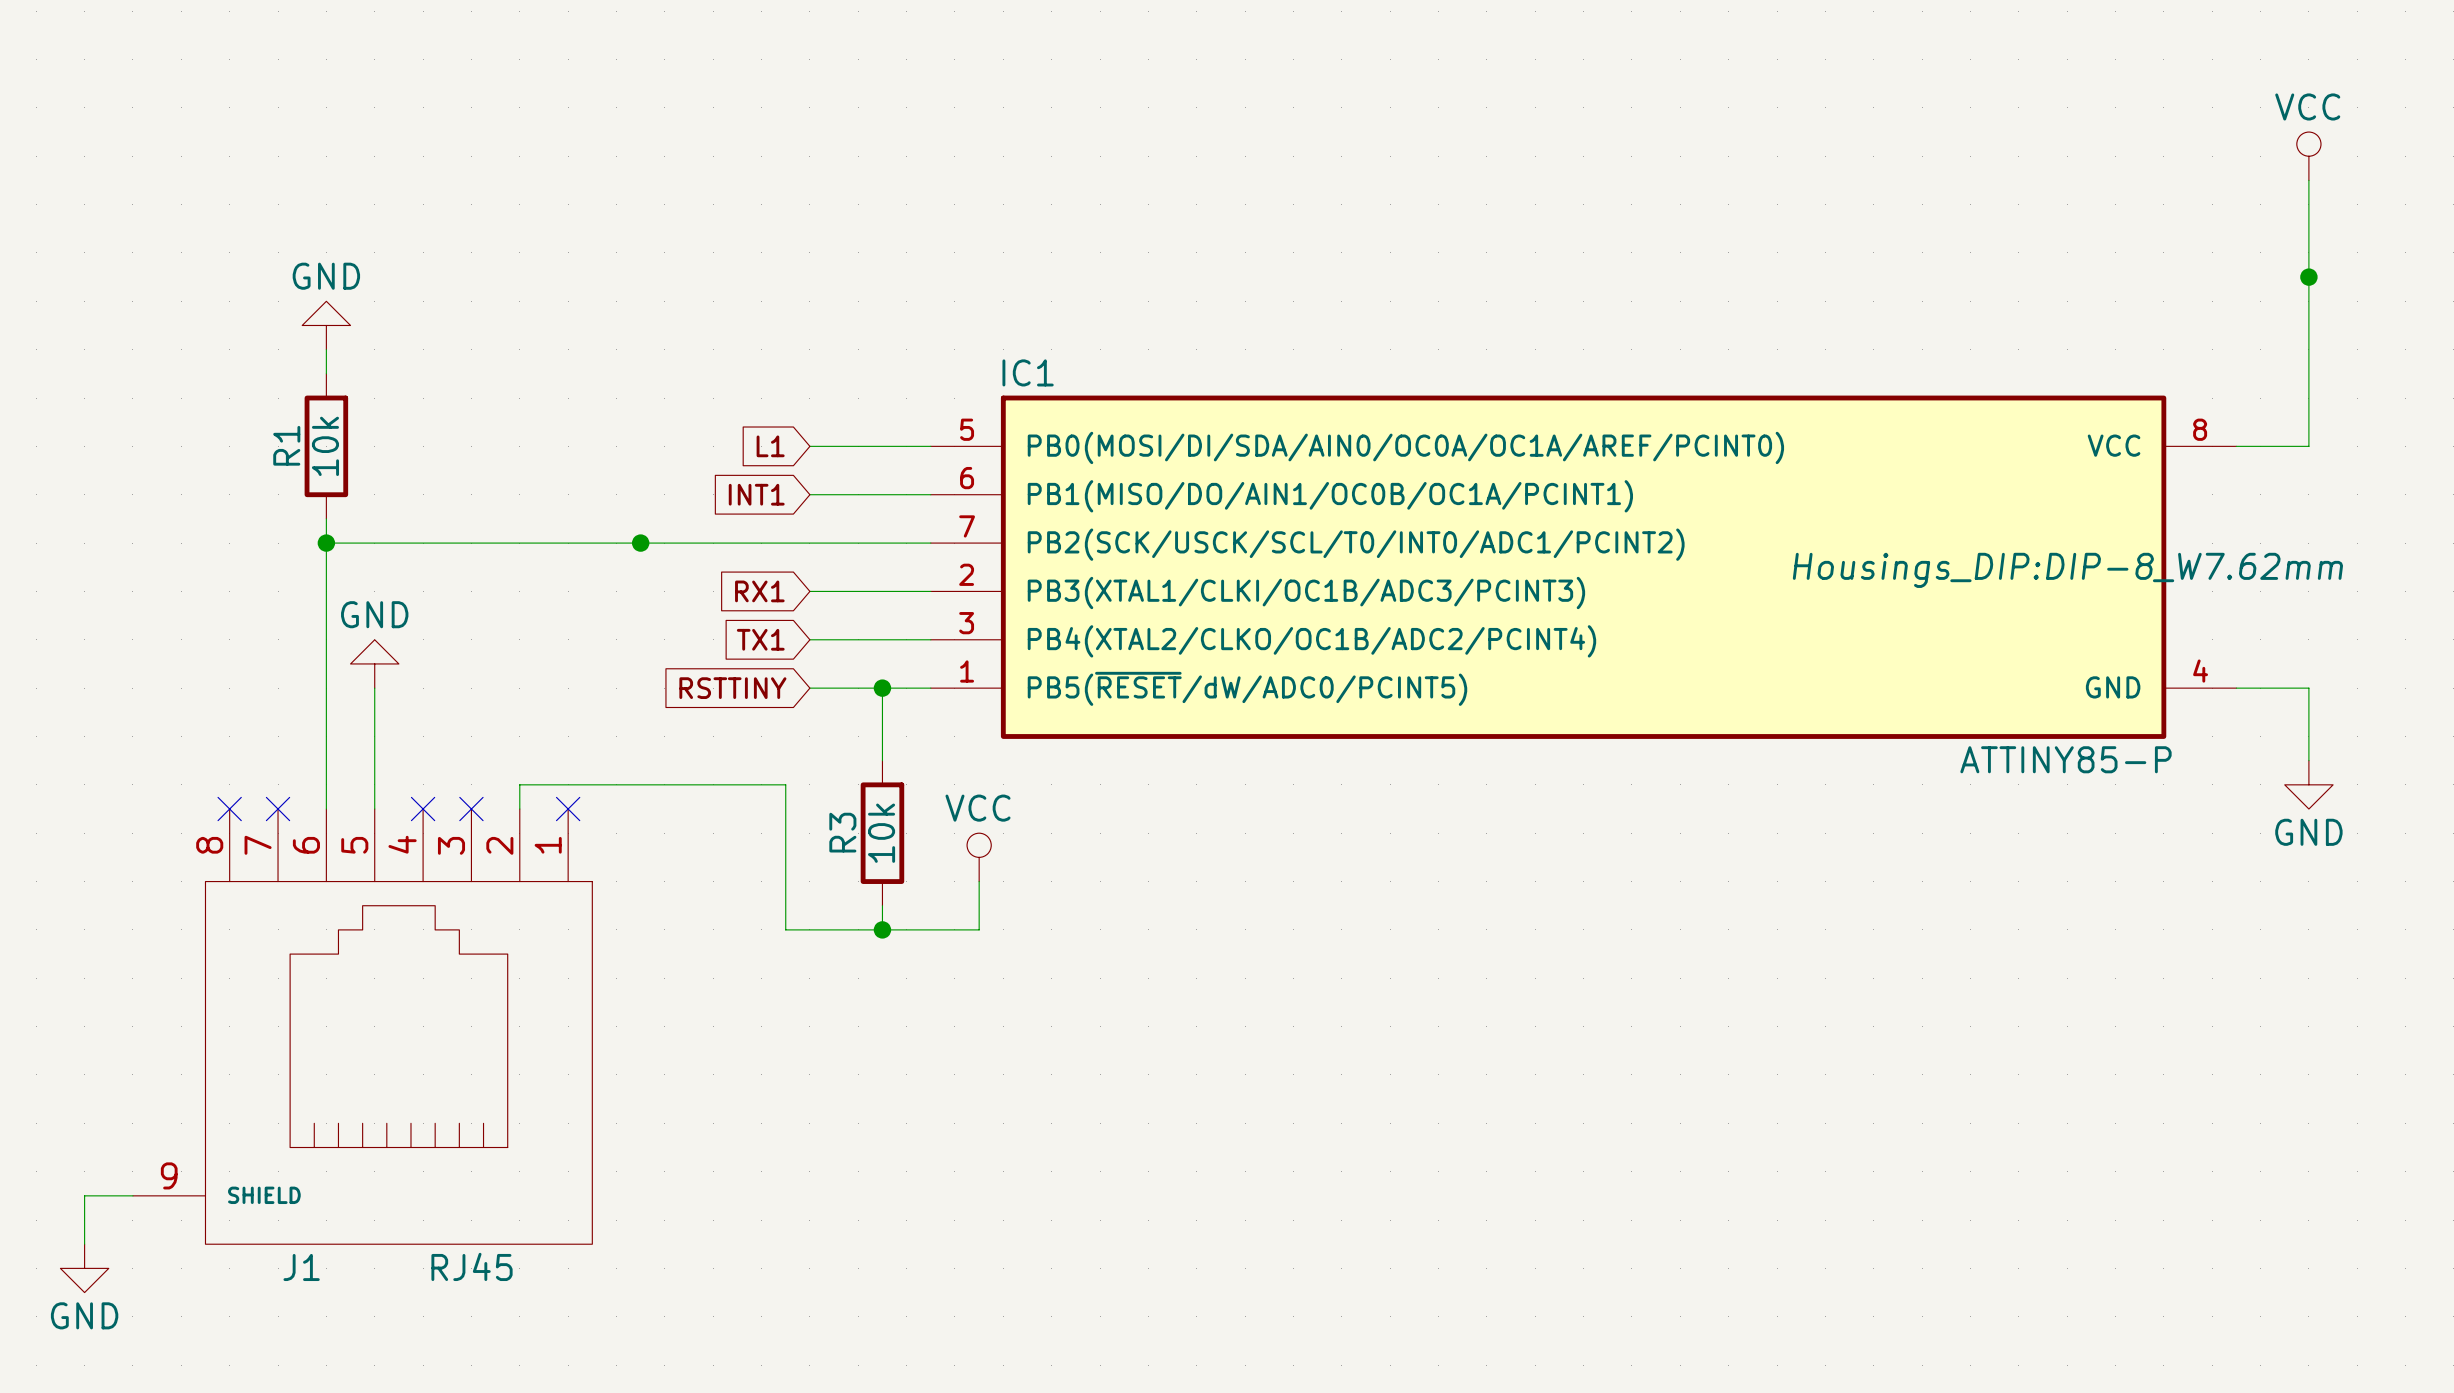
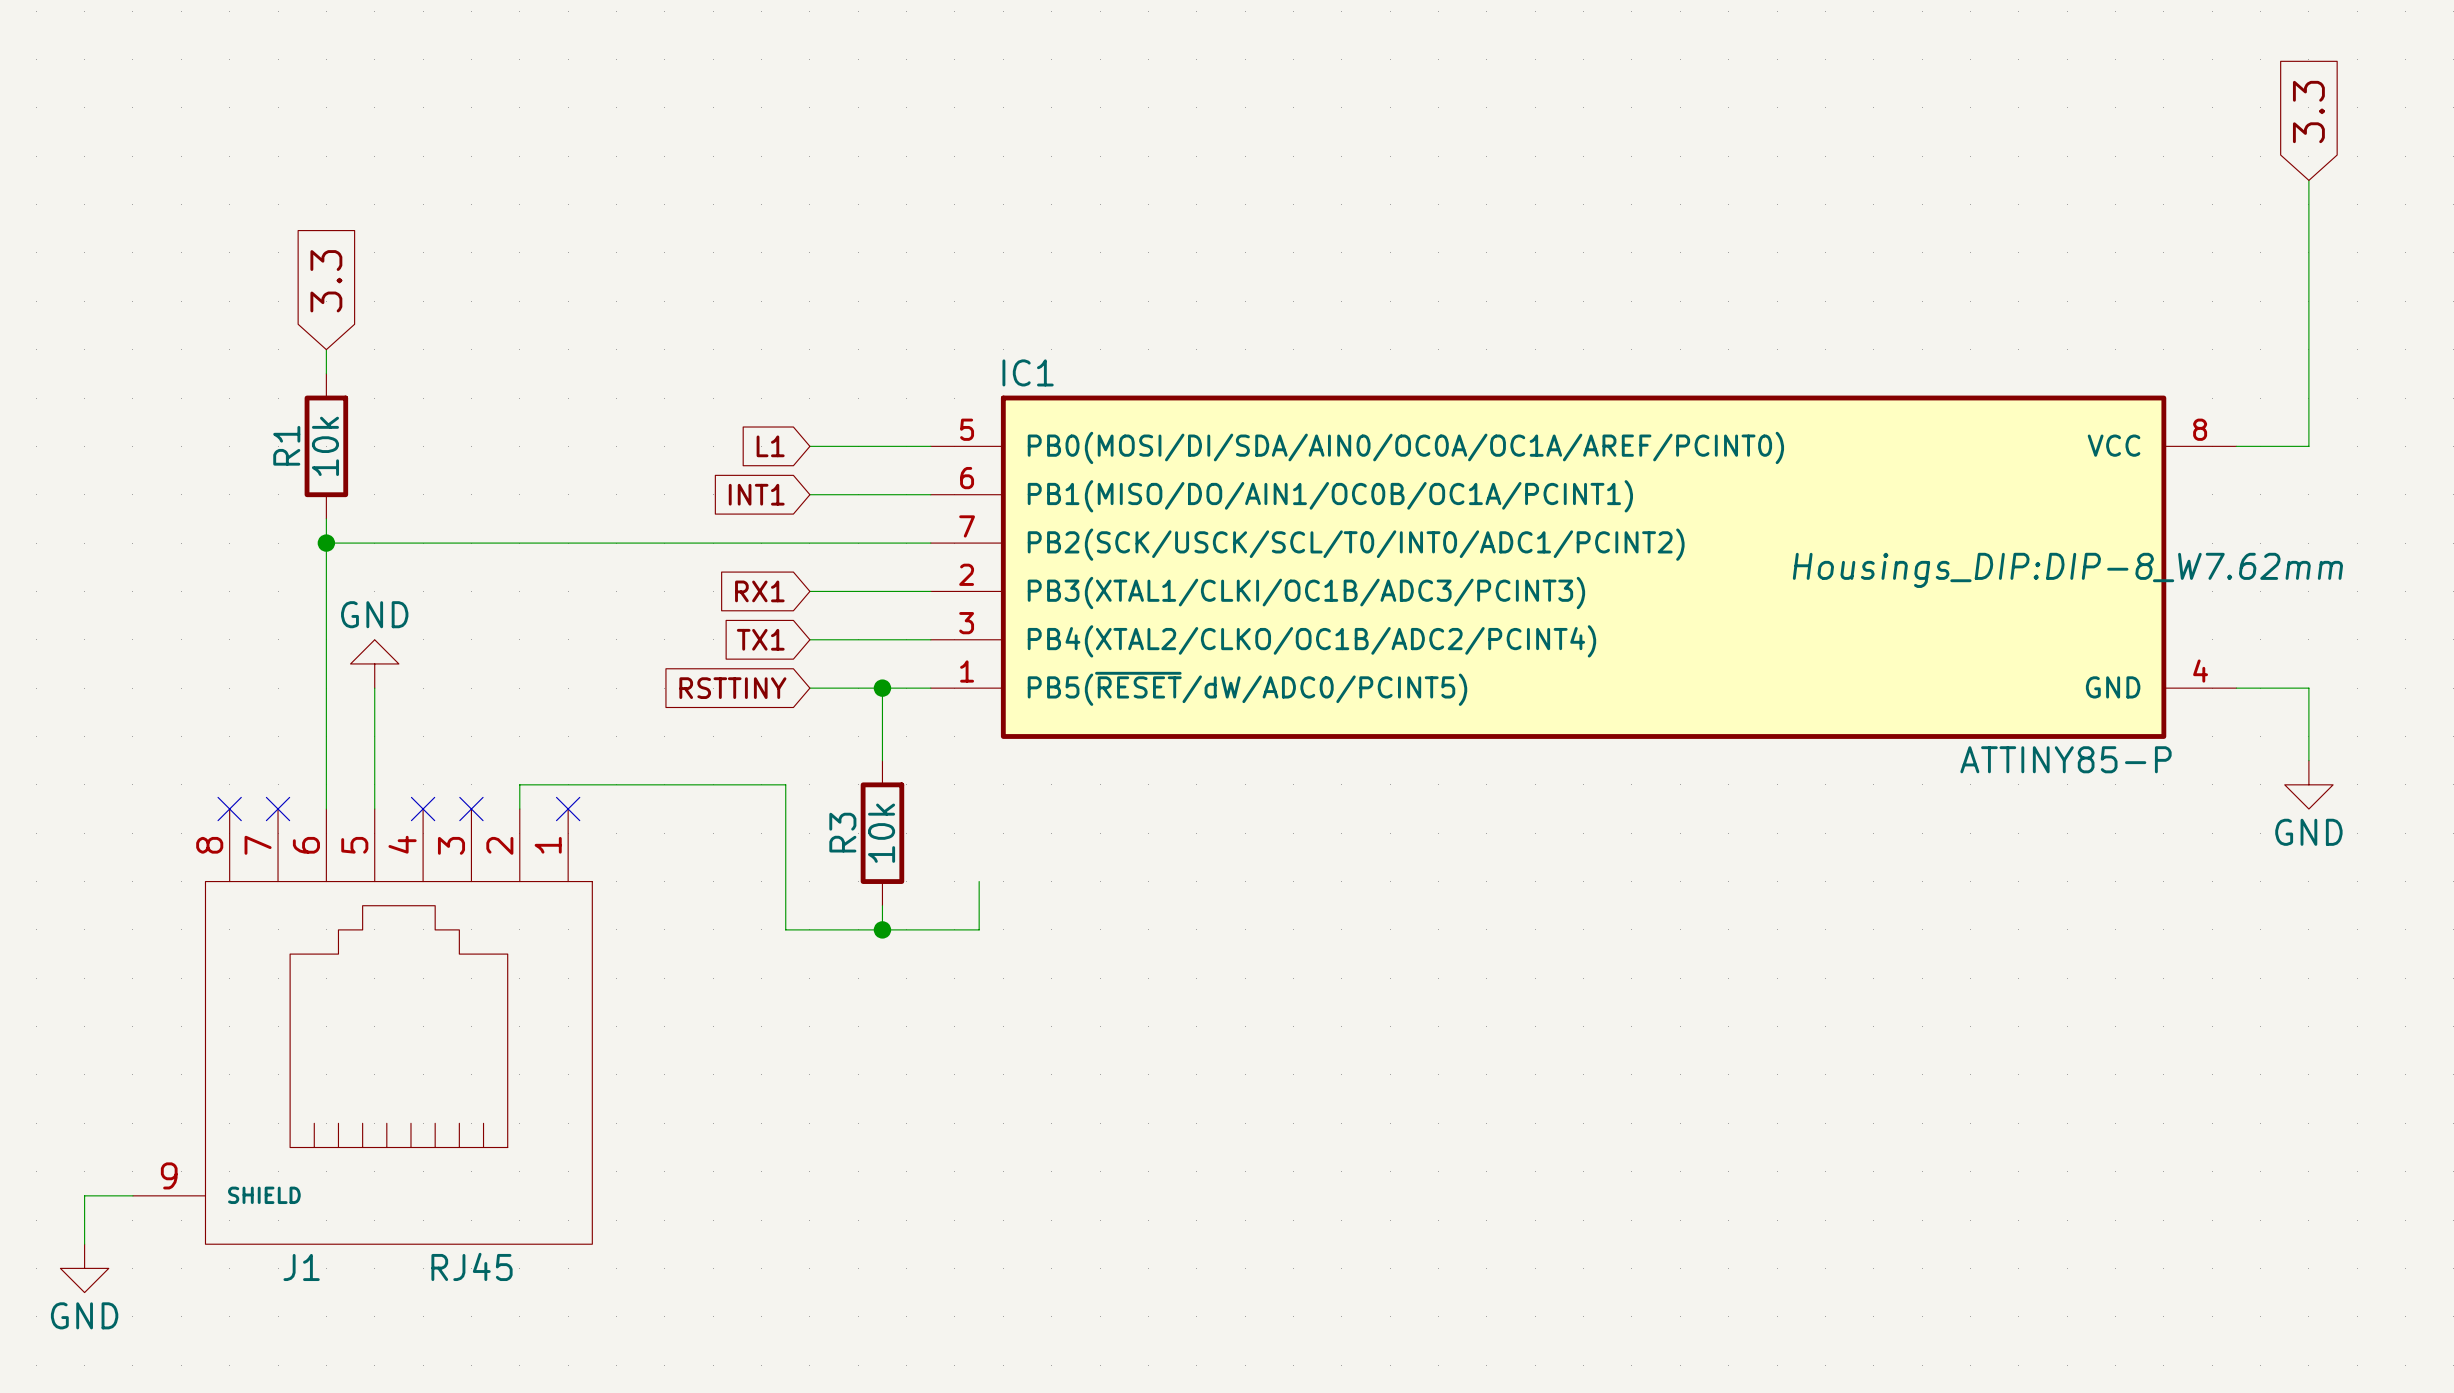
global label: none -> 3.3 (2308, 112)
power symbol: VCC (2308, 156) -> none
junction: (2308, 277) -> none
global label: none -> 3.3 (326, 281)
power symbol: GND (326, 325) -> none
junction: (640, 543) -> none
power symbol: VCC (979, 857) -> none

